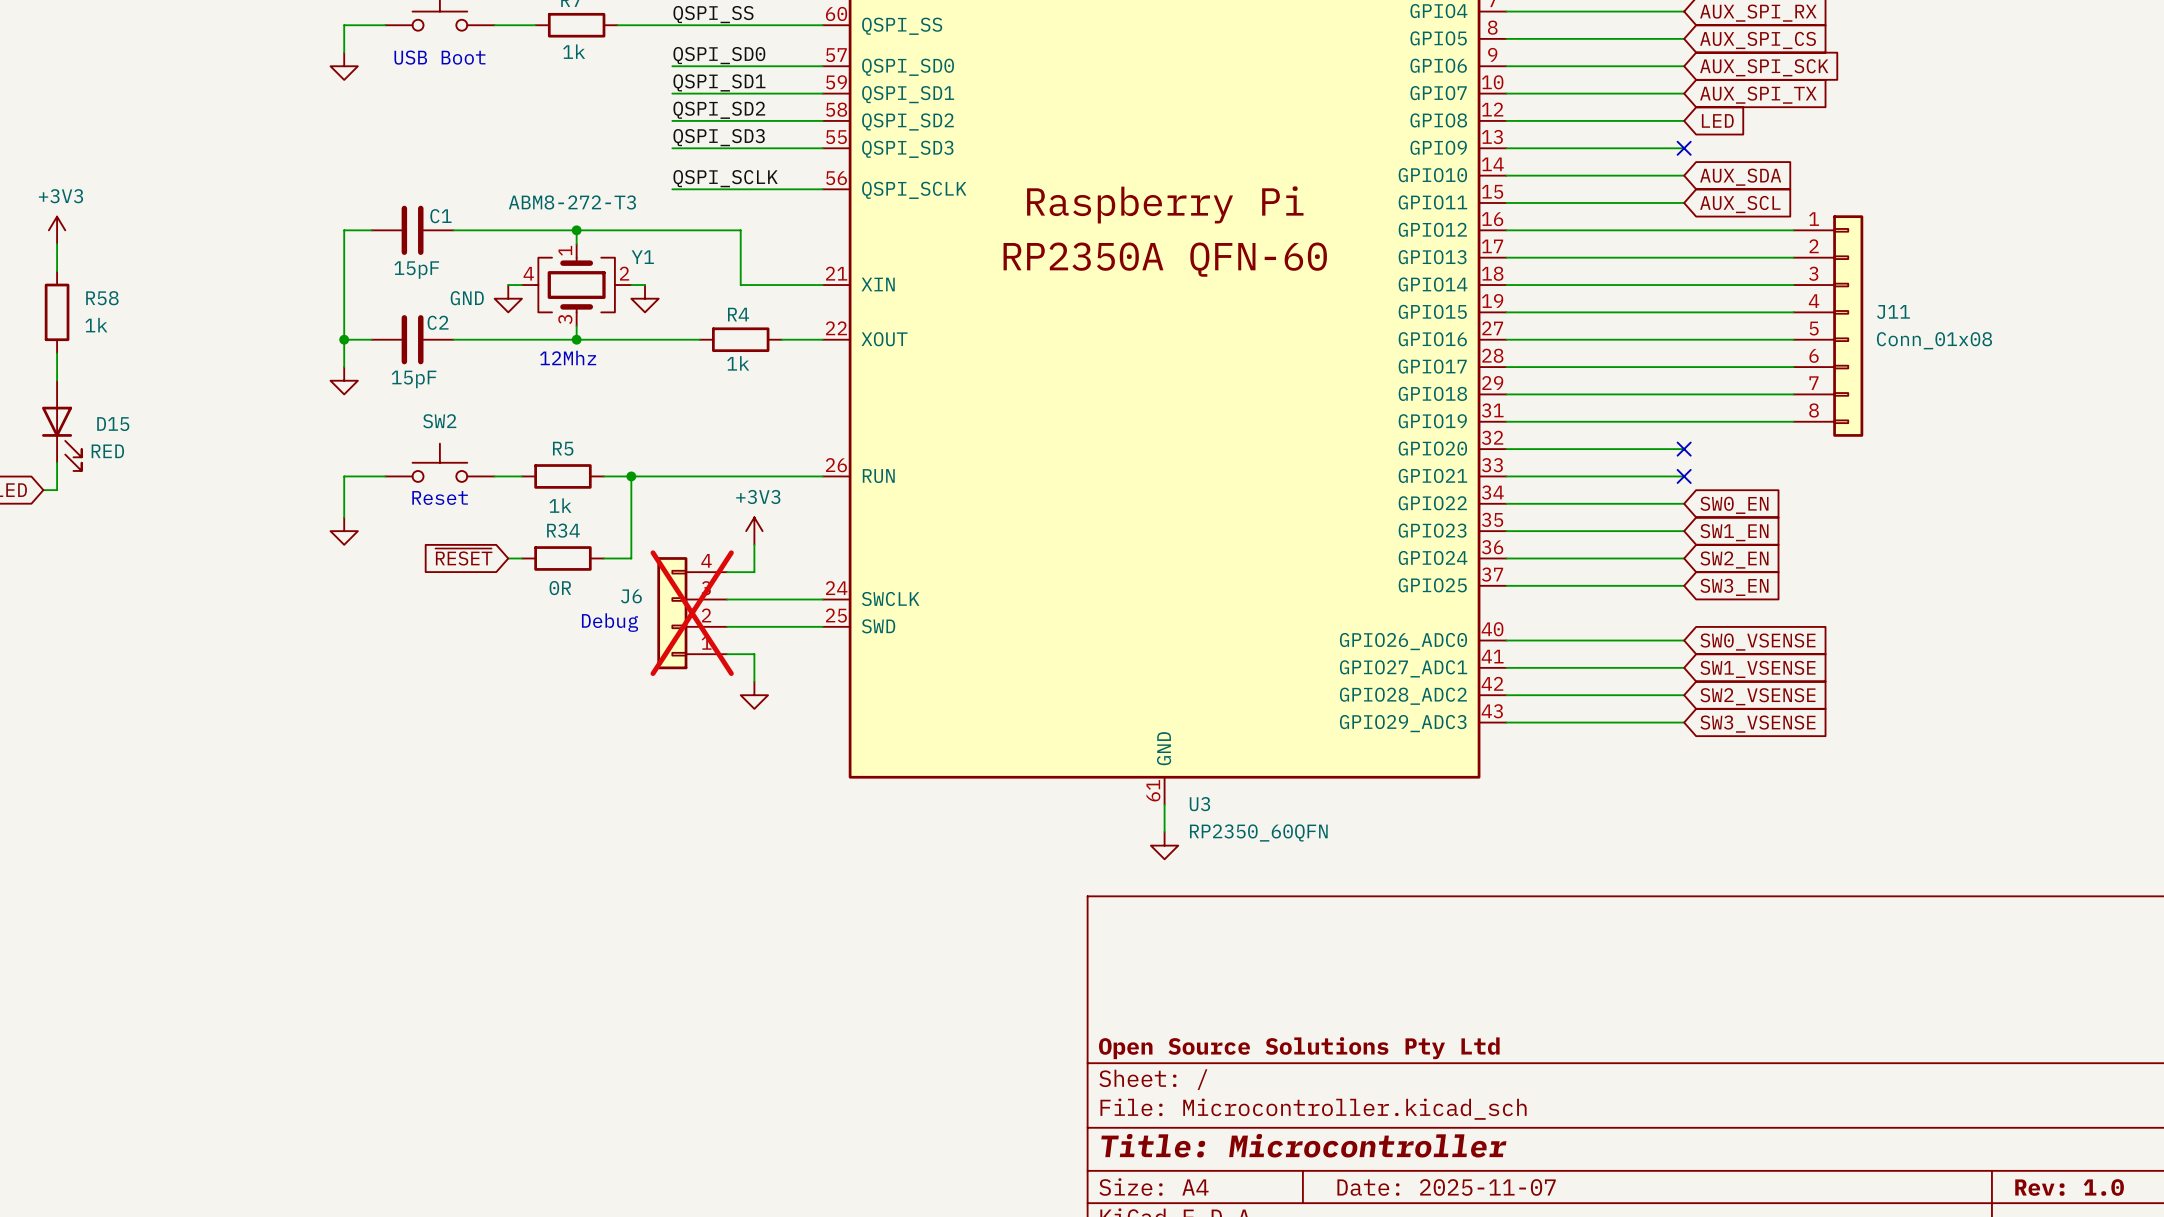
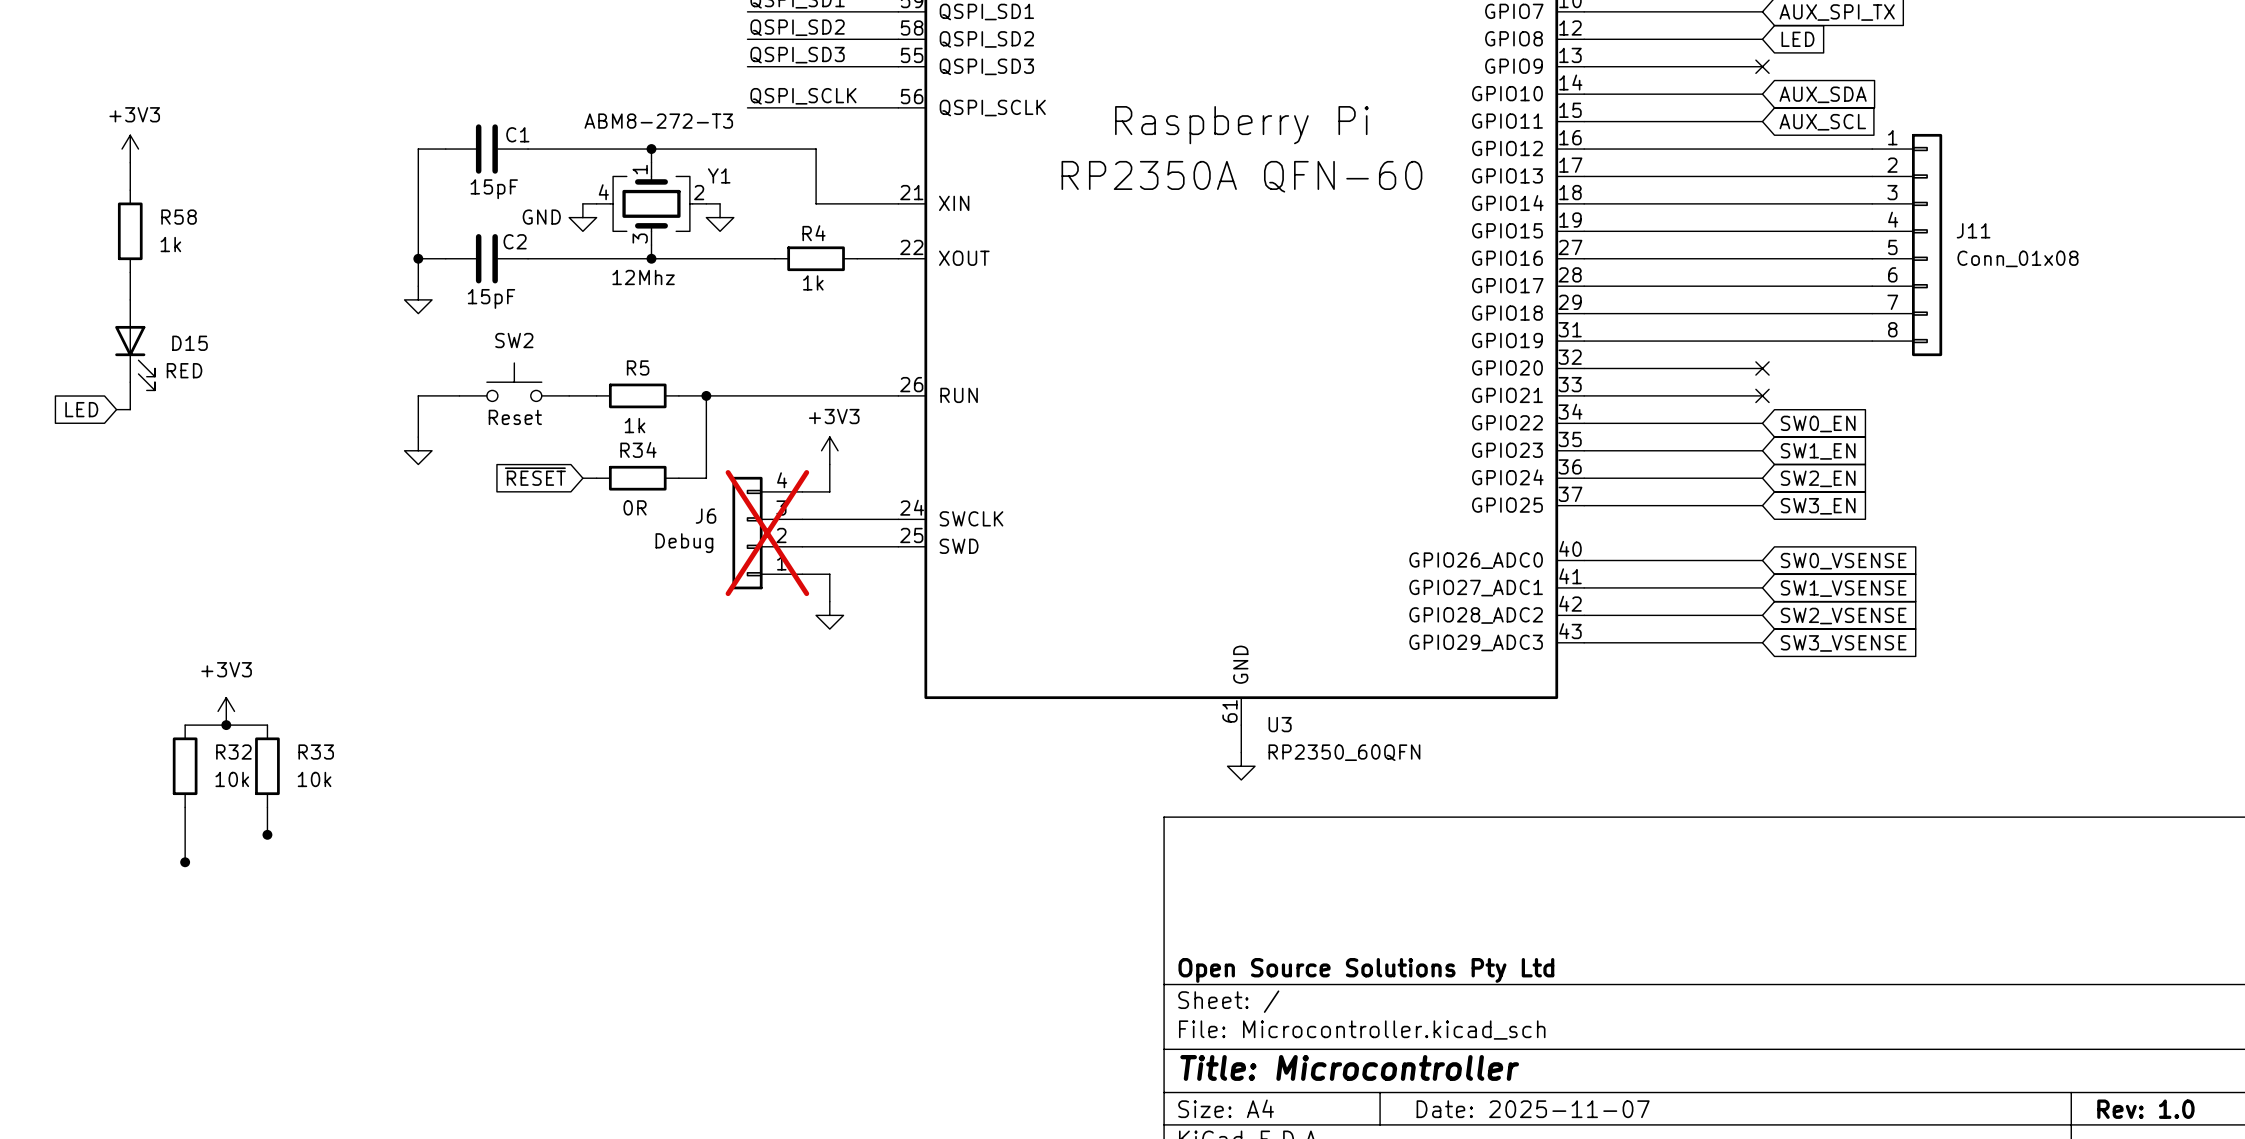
power symbol: none -> +3V3 (226, 711)
wire: none -> (185, 725) (267, 725)
junction: none -> (226, 725)
R32: none -> 10k (185, 766)
R33: none -> 10k (267, 766)
wire: none -> (185, 807) (185, 862)
wire: none -> (267, 807) (267, 834)
junction: none -> (267, 834)
junction: none -> (185, 862)

